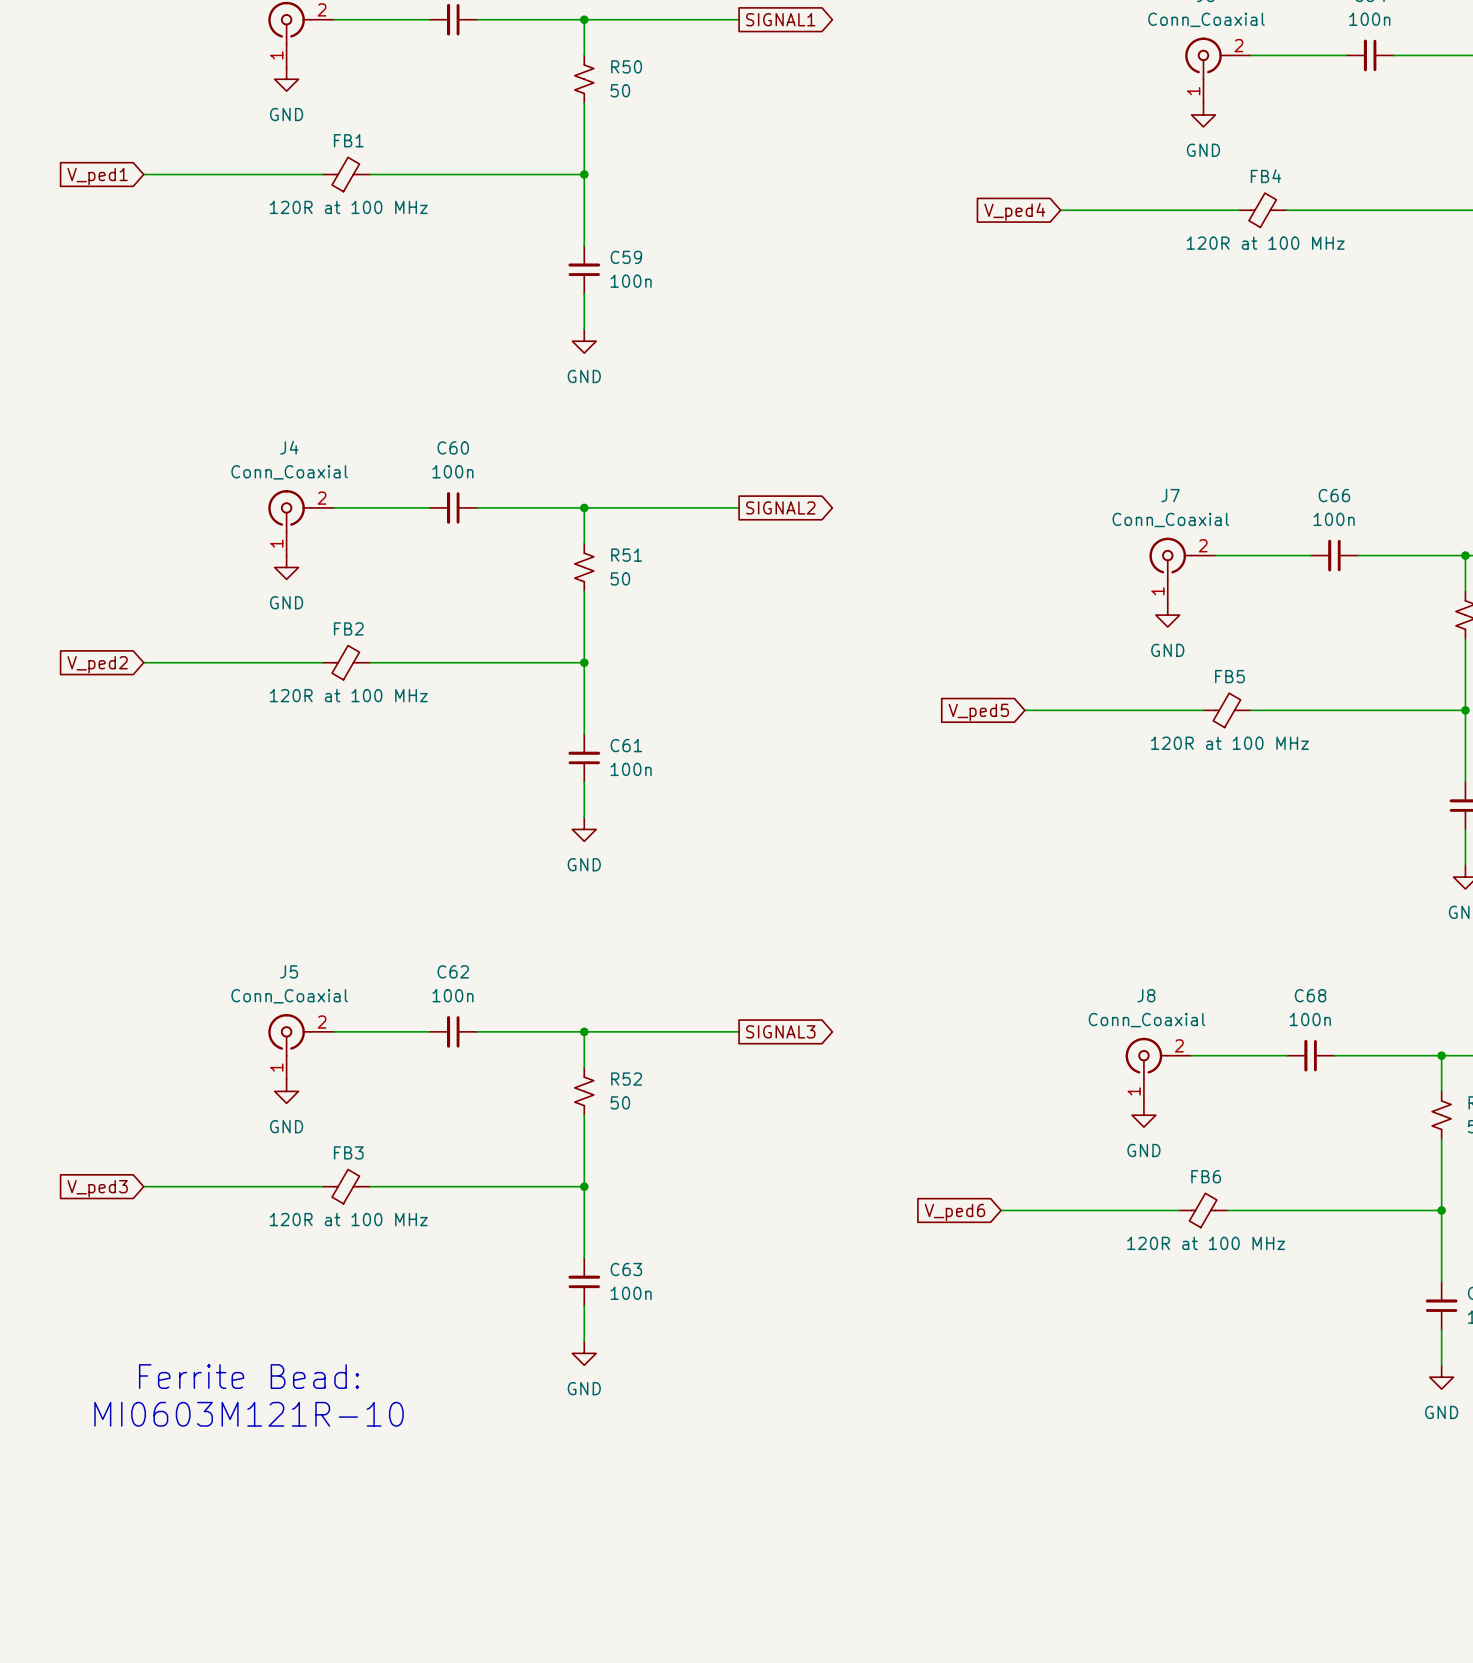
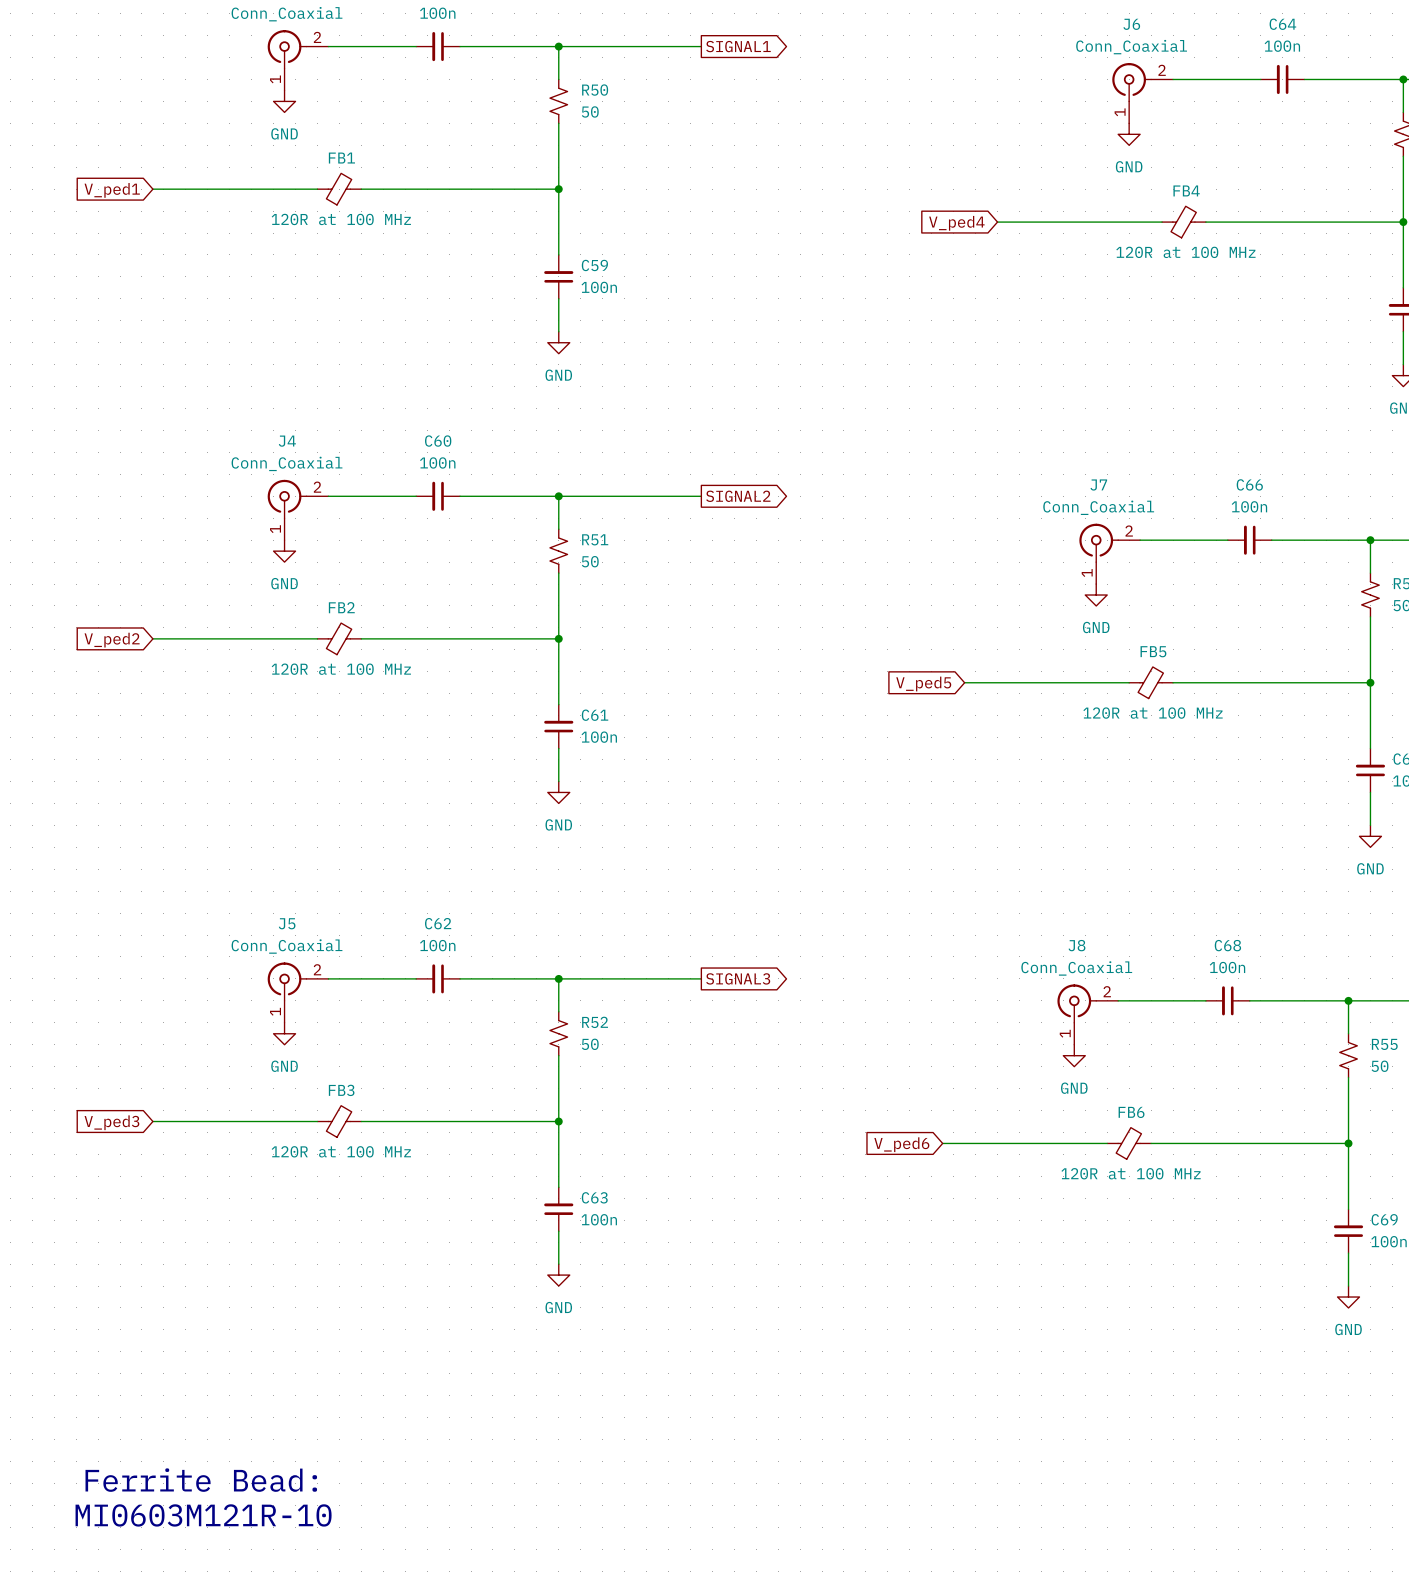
text position: Ferrite Bead: (249, 1376) -> Ferrite Bead: (201, 1480)
text position: MI0603M121R-10 (249, 1414) -> MI0603M121R-10 (203, 1515)

